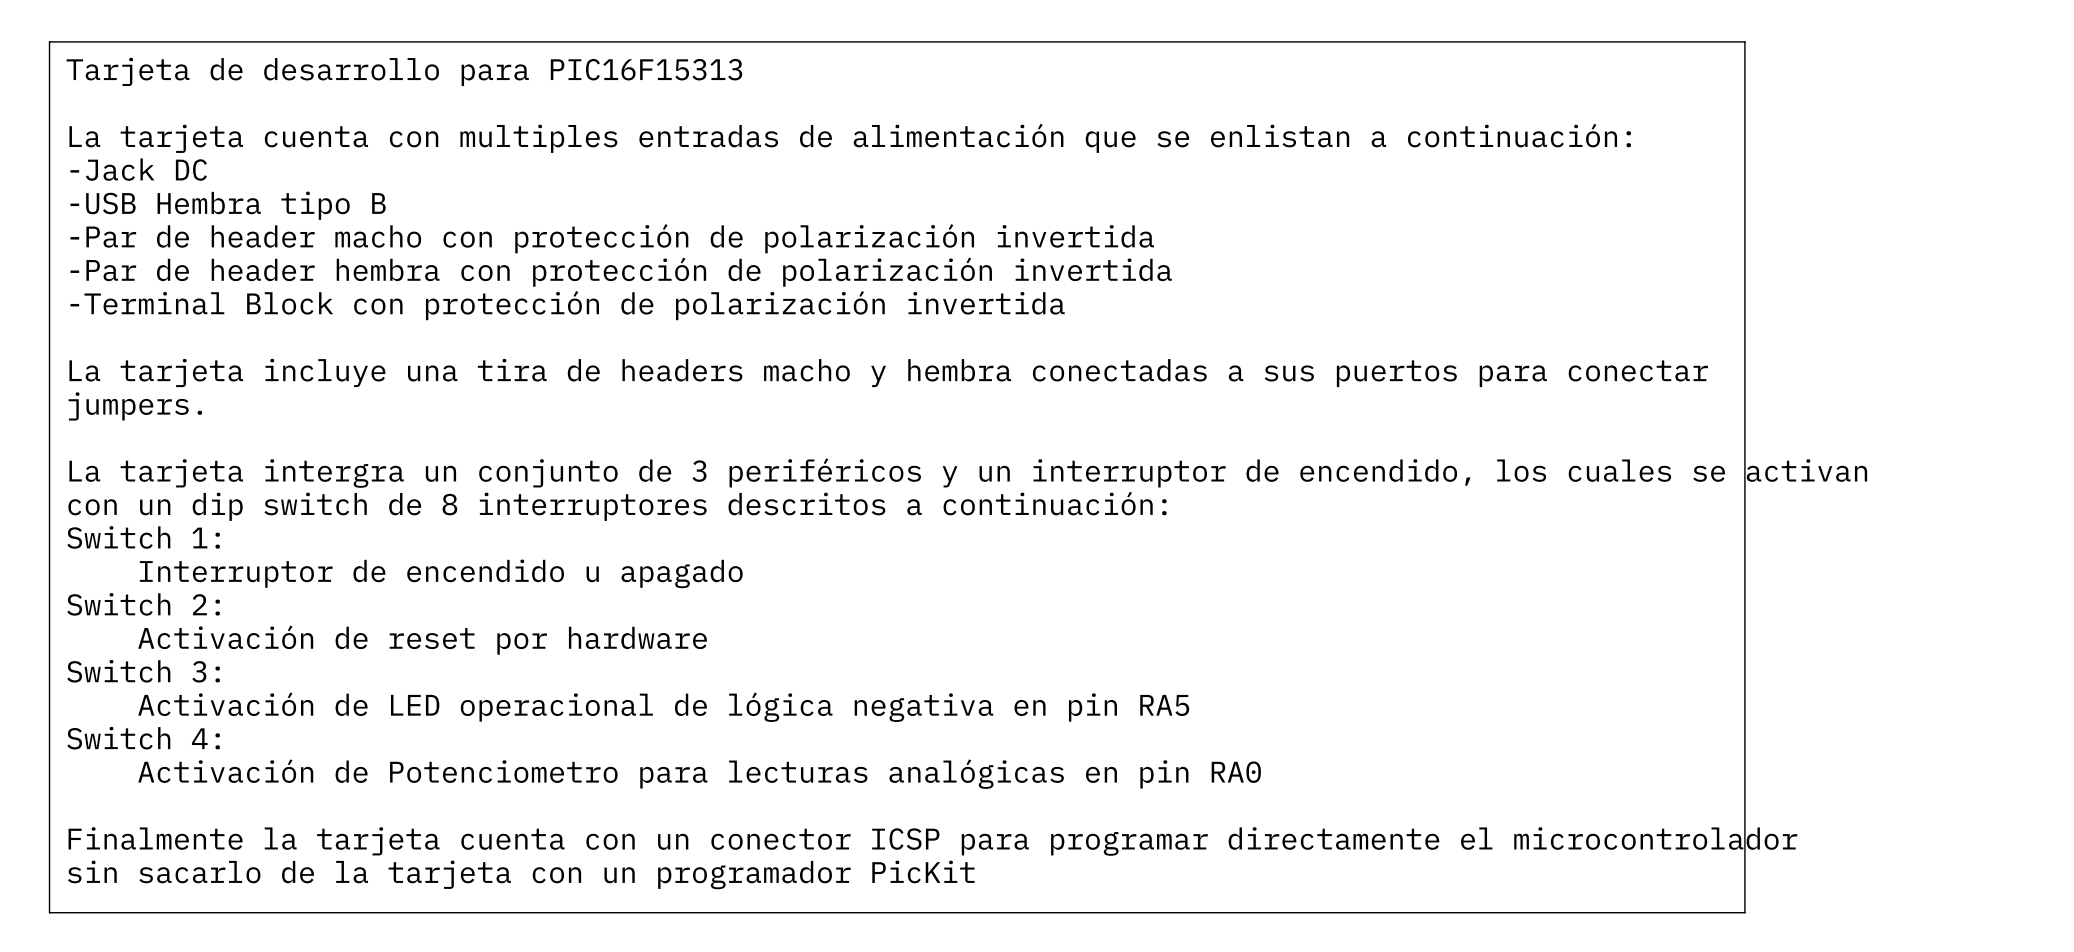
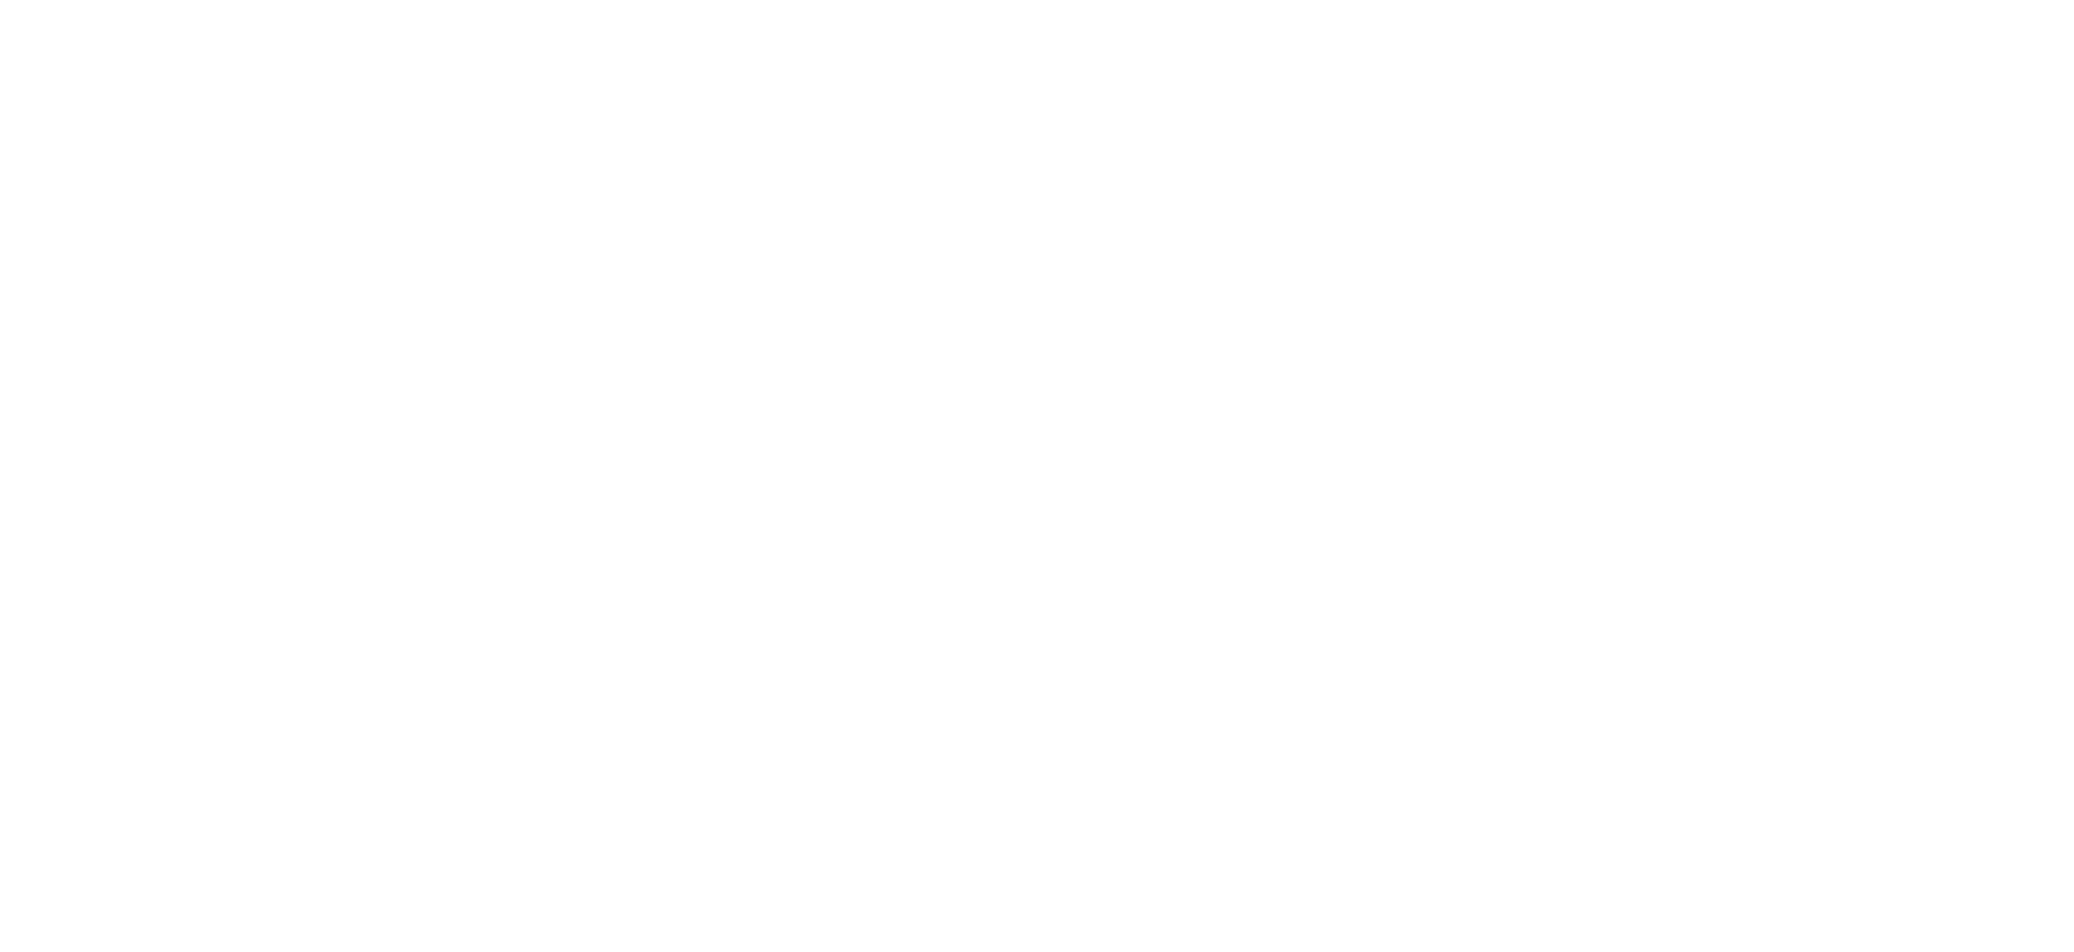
line: (49, 41) (1744, 41) (1744, 912) (49, 912) (49, 41) -> none
text: Tarjeta de desarrollo para PIC16F15313 (404, 71) -> none
text: La tarjeta cuenta con multiples entradas de alimentación que se enlistan a continuación: (850, 138) -> none
text: -Jack DC (138, 169) -> none
text: -USB Hembra tipo B (228, 205) -> none
text: -Par de header macho con protección de polarización invertida (612, 238) -> none
text: -Par de header hembra con protección de polarización invertida (621, 272) -> none
text: -Terminal Block con protección de polarización invertida (567, 305) -> none
text: La tarjeta incluye una tira de headers macho y hembra conectadas a sus puertos para conectar (888, 372) -> none
text: jumpers. (135, 406) -> none
text: La tarjeta intergra un conjunto de 3 periféricos y un interruptor de encendido, los cuales se activan (968, 473) -> none
text: con un dip switch de 8 interruptores descritos a continuación: (617, 506) -> none
text: Switch 1: (143, 537) -> none
text: Interruptor de encendido u apagado (441, 573) -> none
text: Switch 2: (143, 604) -> none
text: Activación de reset por hardware (422, 640) -> none
text: Switch 3: (143, 671) -> none
text: Activación de LED operacional de lógica negativa en pin RA5 (663, 707) -> none
text: Switch 4: (143, 738) -> none
text: Activación de Potenciometro para lecturas analógicas en pin RA0 (699, 774) -> none
text: Finalmente la tarjeta cuenta con un conector ICSP para programar directamente el microcontrolador (932, 841) -> none
text: sin sacarlo de la tarjeta con un programador PicKit (521, 874) -> none

